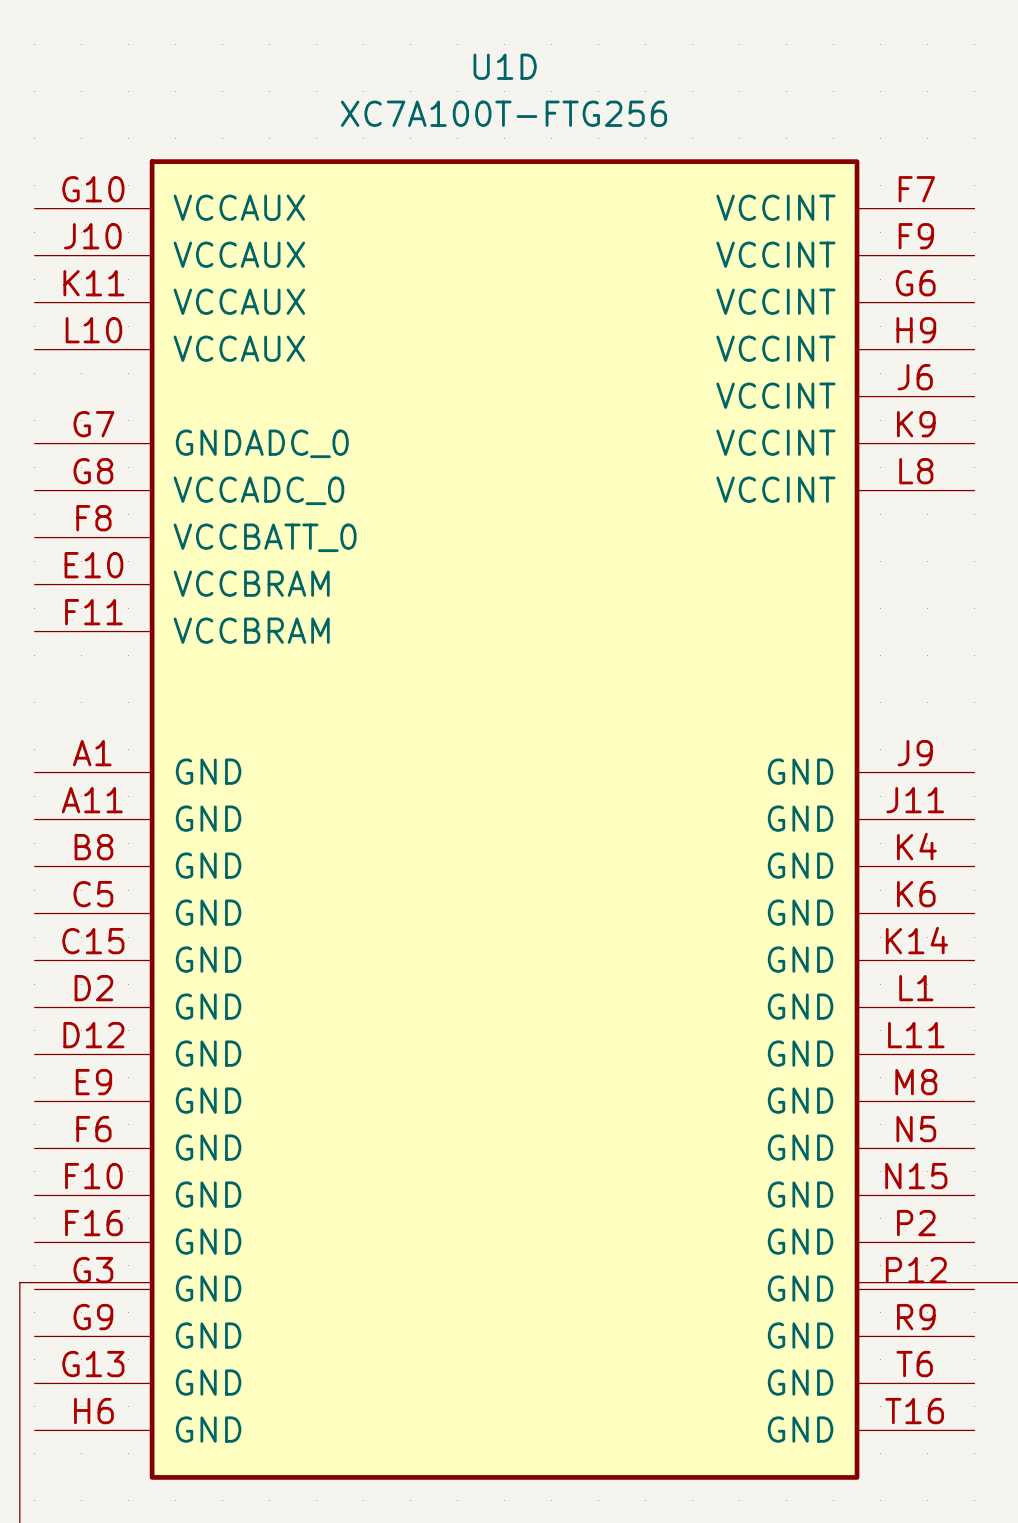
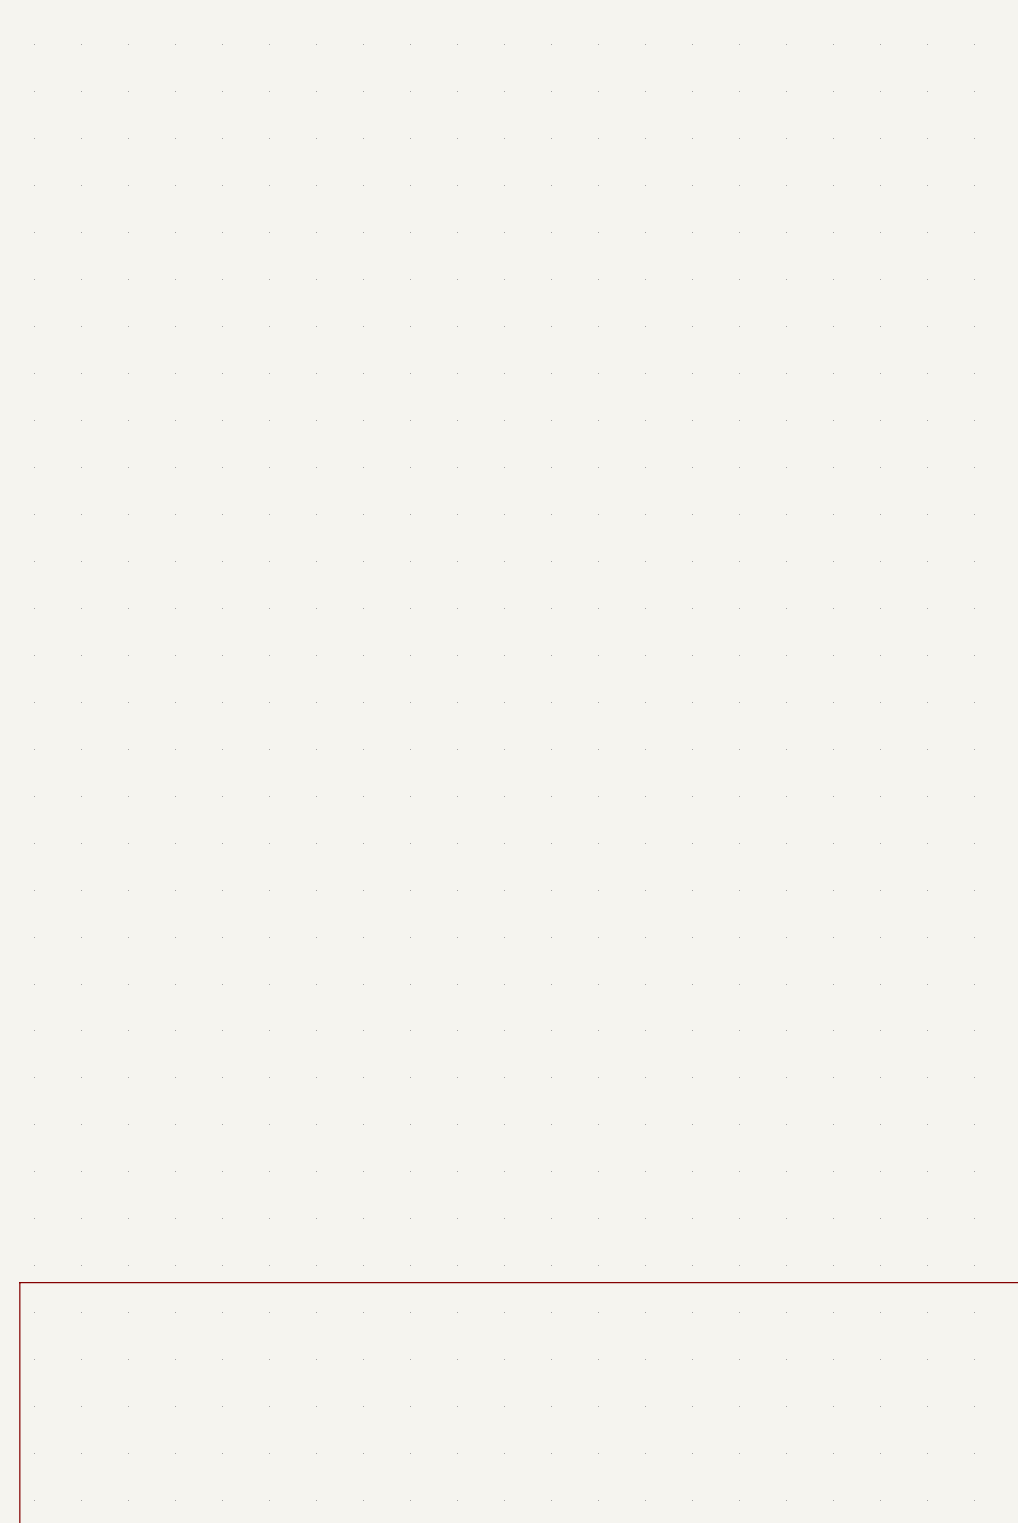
U1D: XC7A100T-FTG256 (504, 819) -> none

